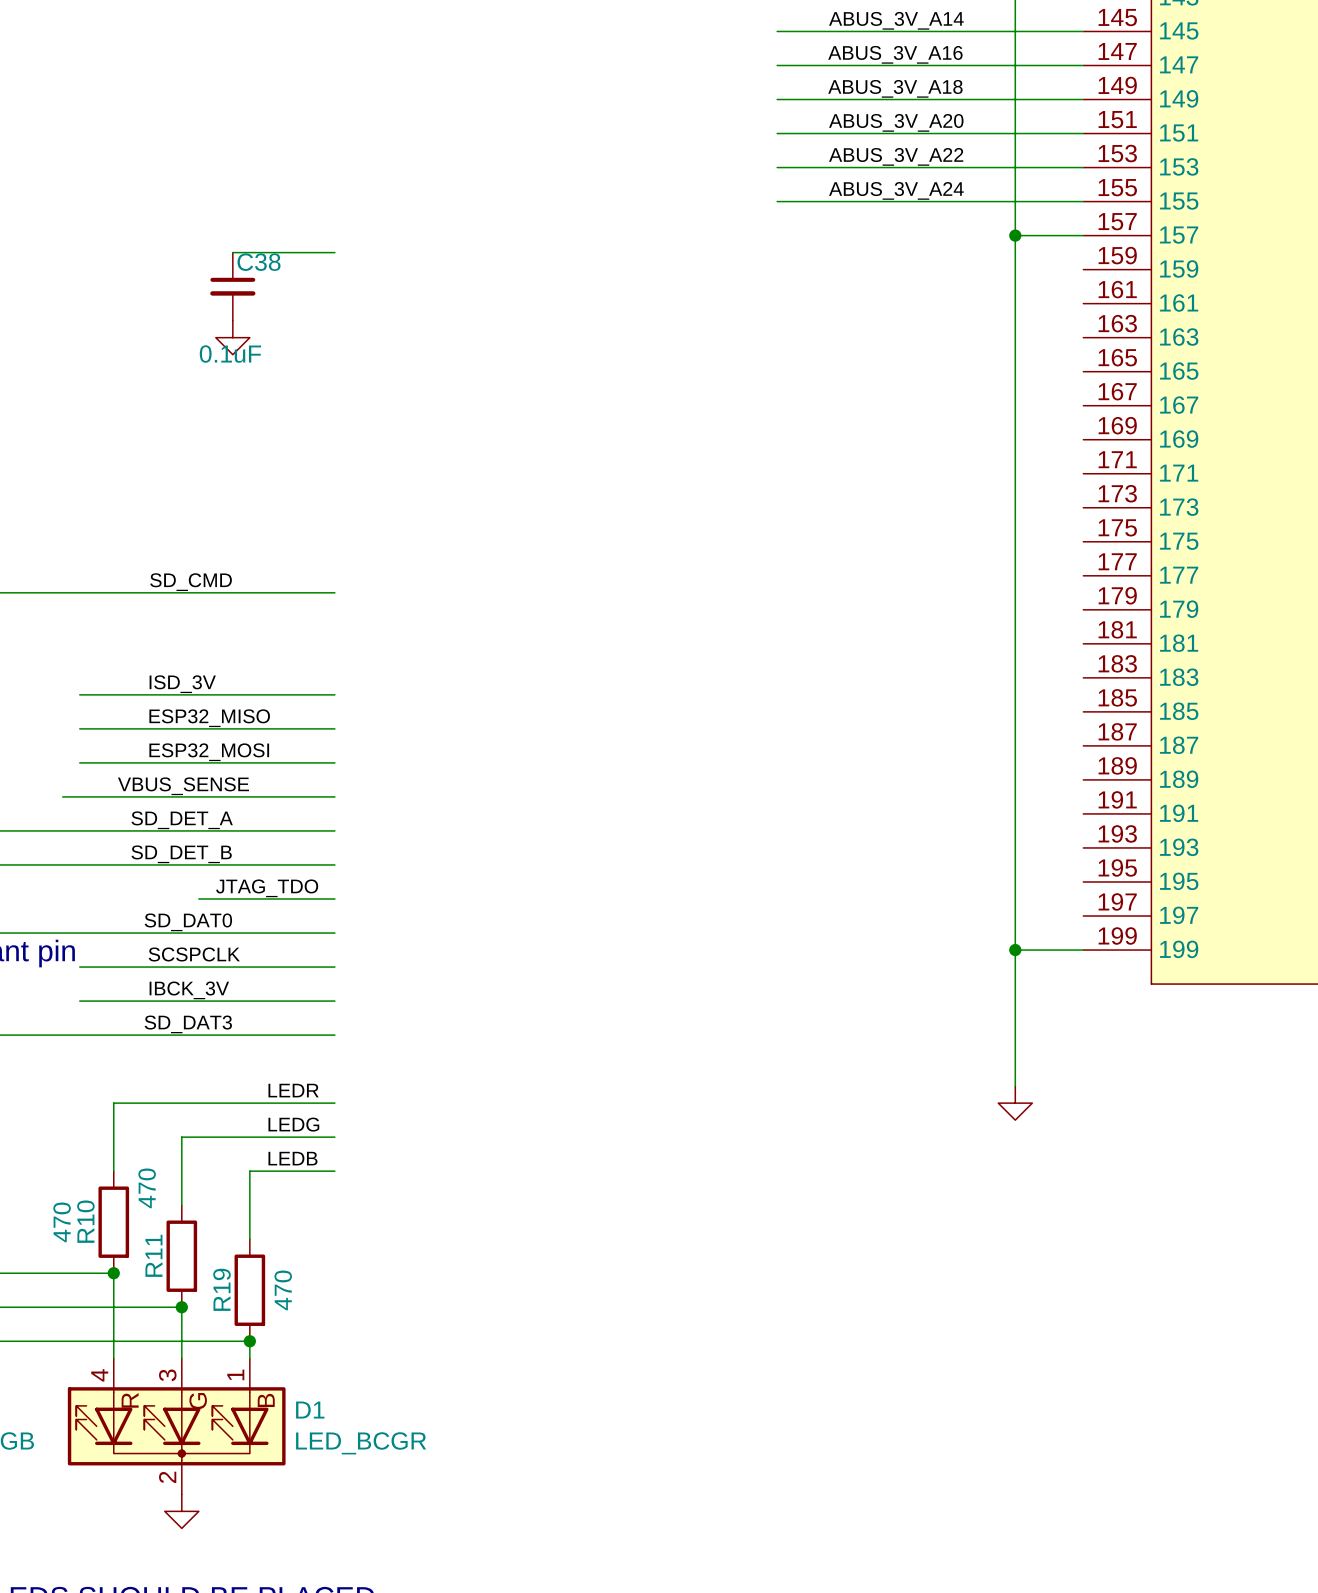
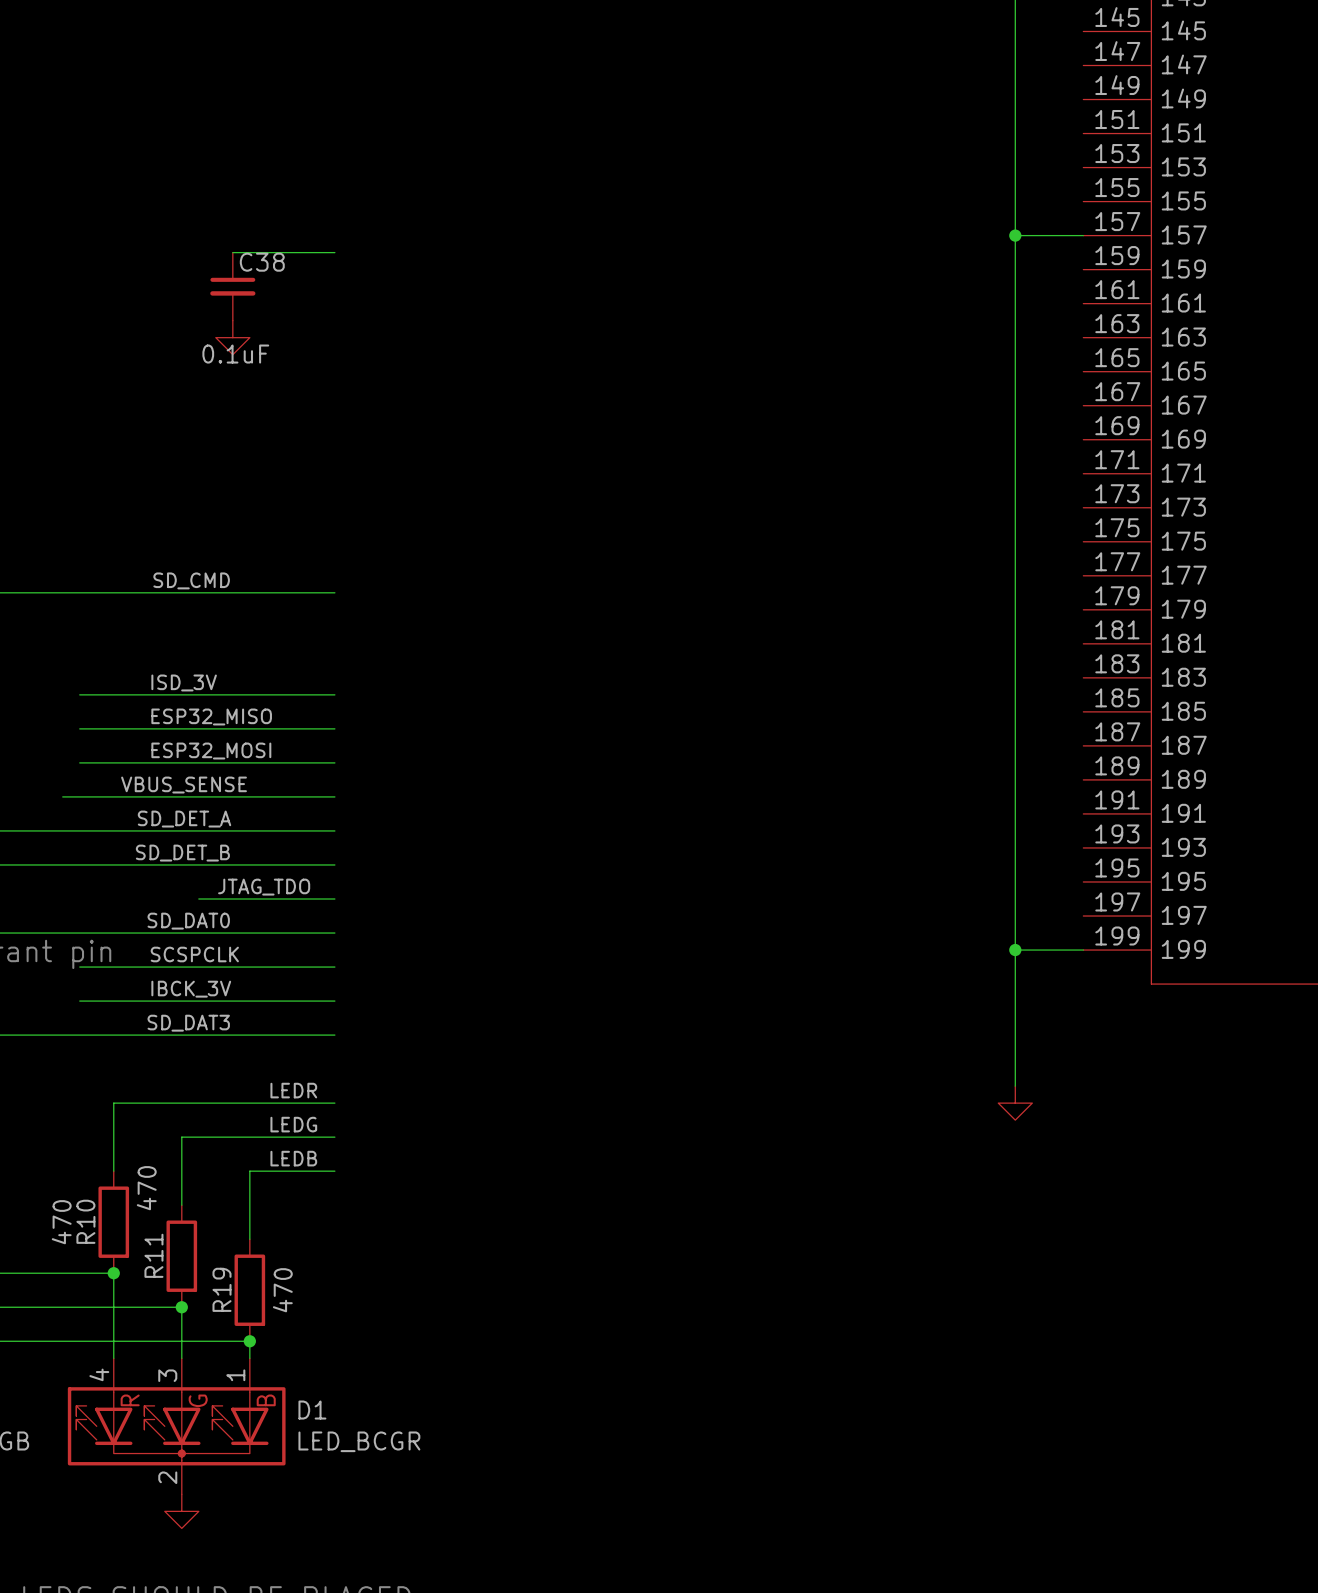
label: ABUS_3V_A14 (896, 20) -> none
wire: (777, 31) (1083, 31) -> none
label: ABUS_3V_A16 (895, 54) -> none
wire: (777, 65) (1083, 65) -> none
label: ABUS_3V_A18 (895, 88) -> none
wire: (777, 99) (1083, 99) -> none
label: ABUS_3V_A20 (896, 122) -> none
wire: (777, 133) (1083, 133) -> none
label: ABUS_3V_A22 (896, 156) -> none
wire: (777, 167) (1083, 167) -> none
label: ABUS_3V_A24 (896, 190) -> none
wire: (777, 201) (1083, 201) -> none

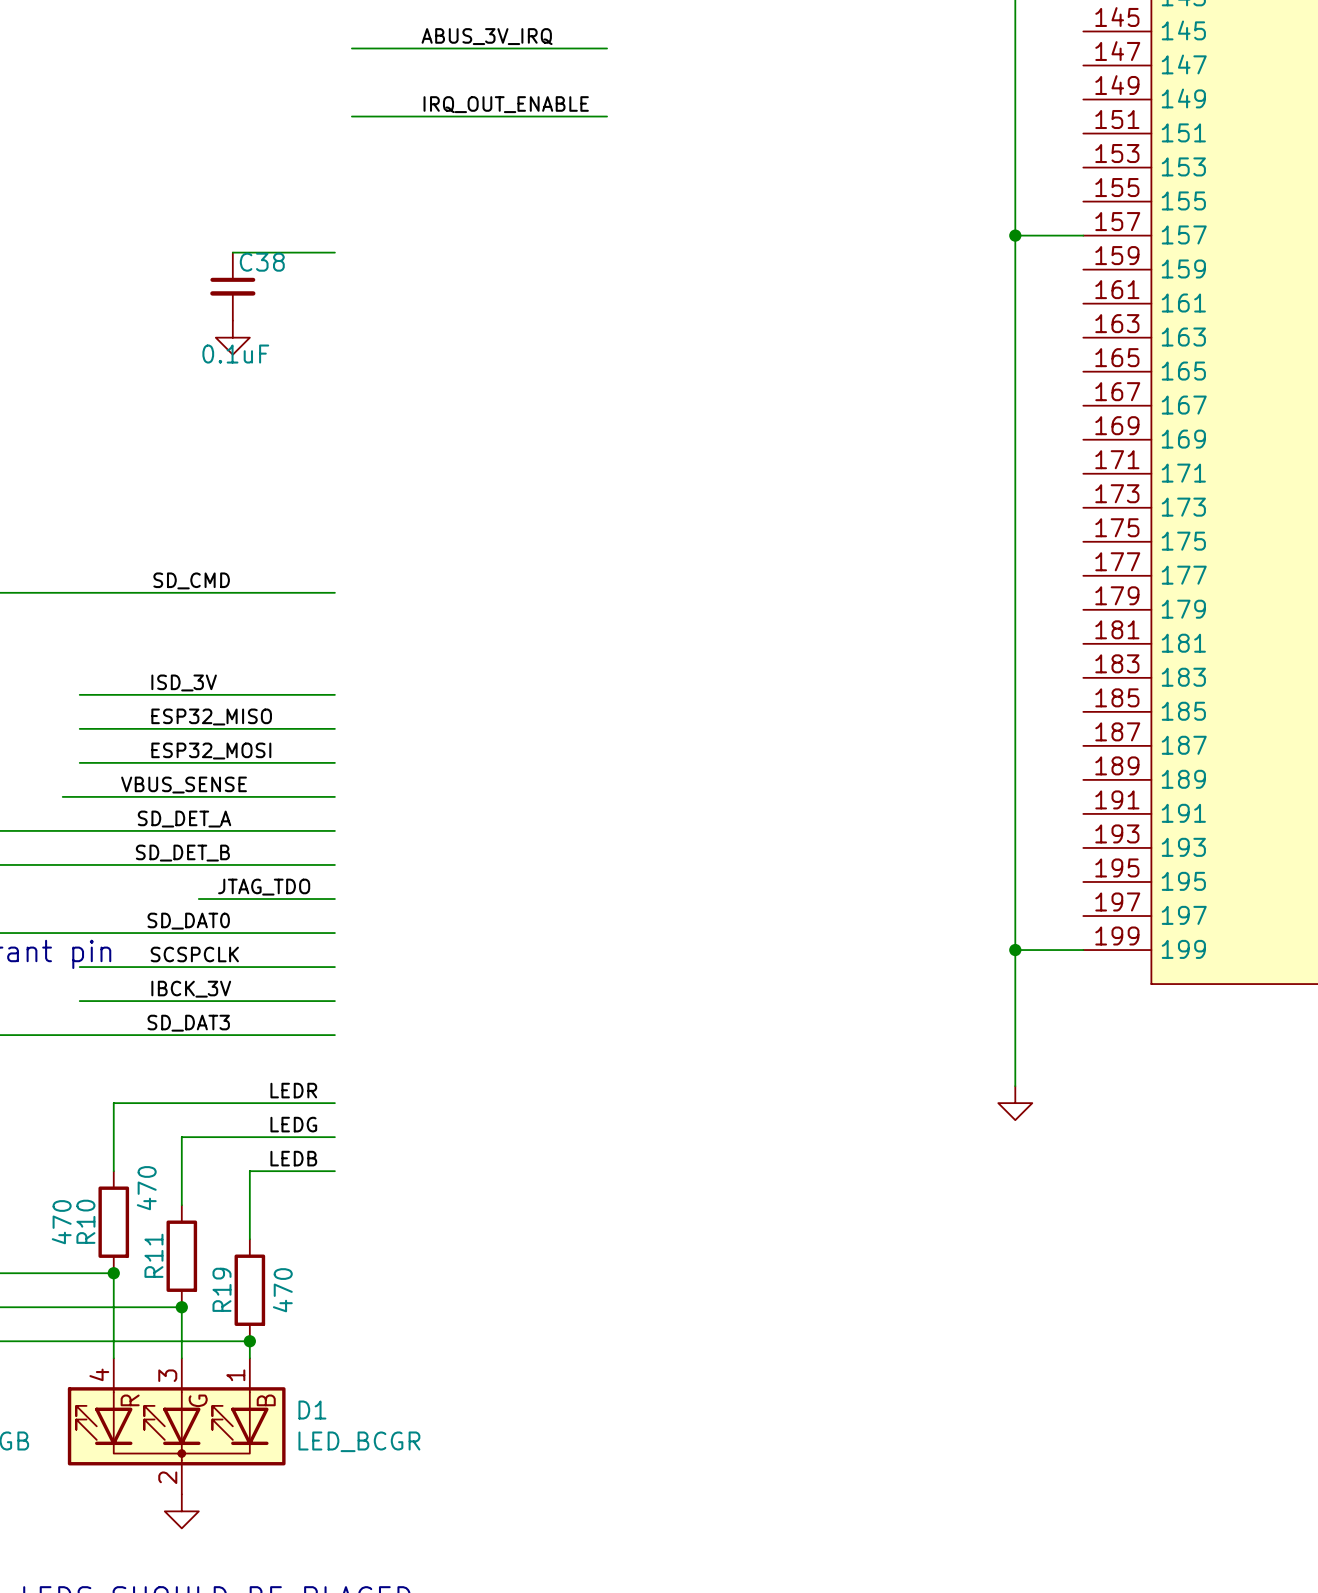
label: none -> ABUS_3V_IRQ (487, 36)
wire: none -> (351, 48) (607, 48)
label: none -> IRQ_OUT_ENABLE (506, 104)
wire: none -> (351, 116) (607, 116)

